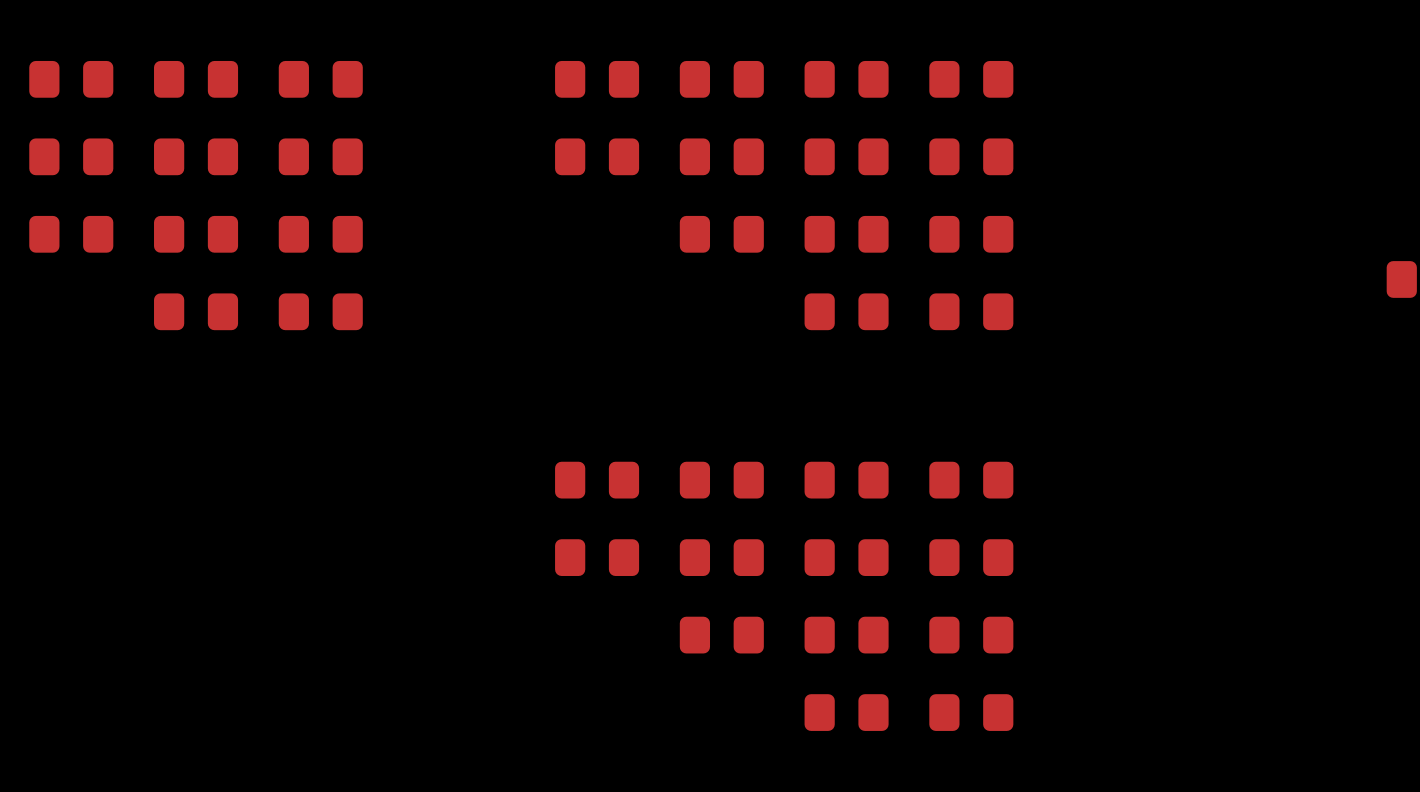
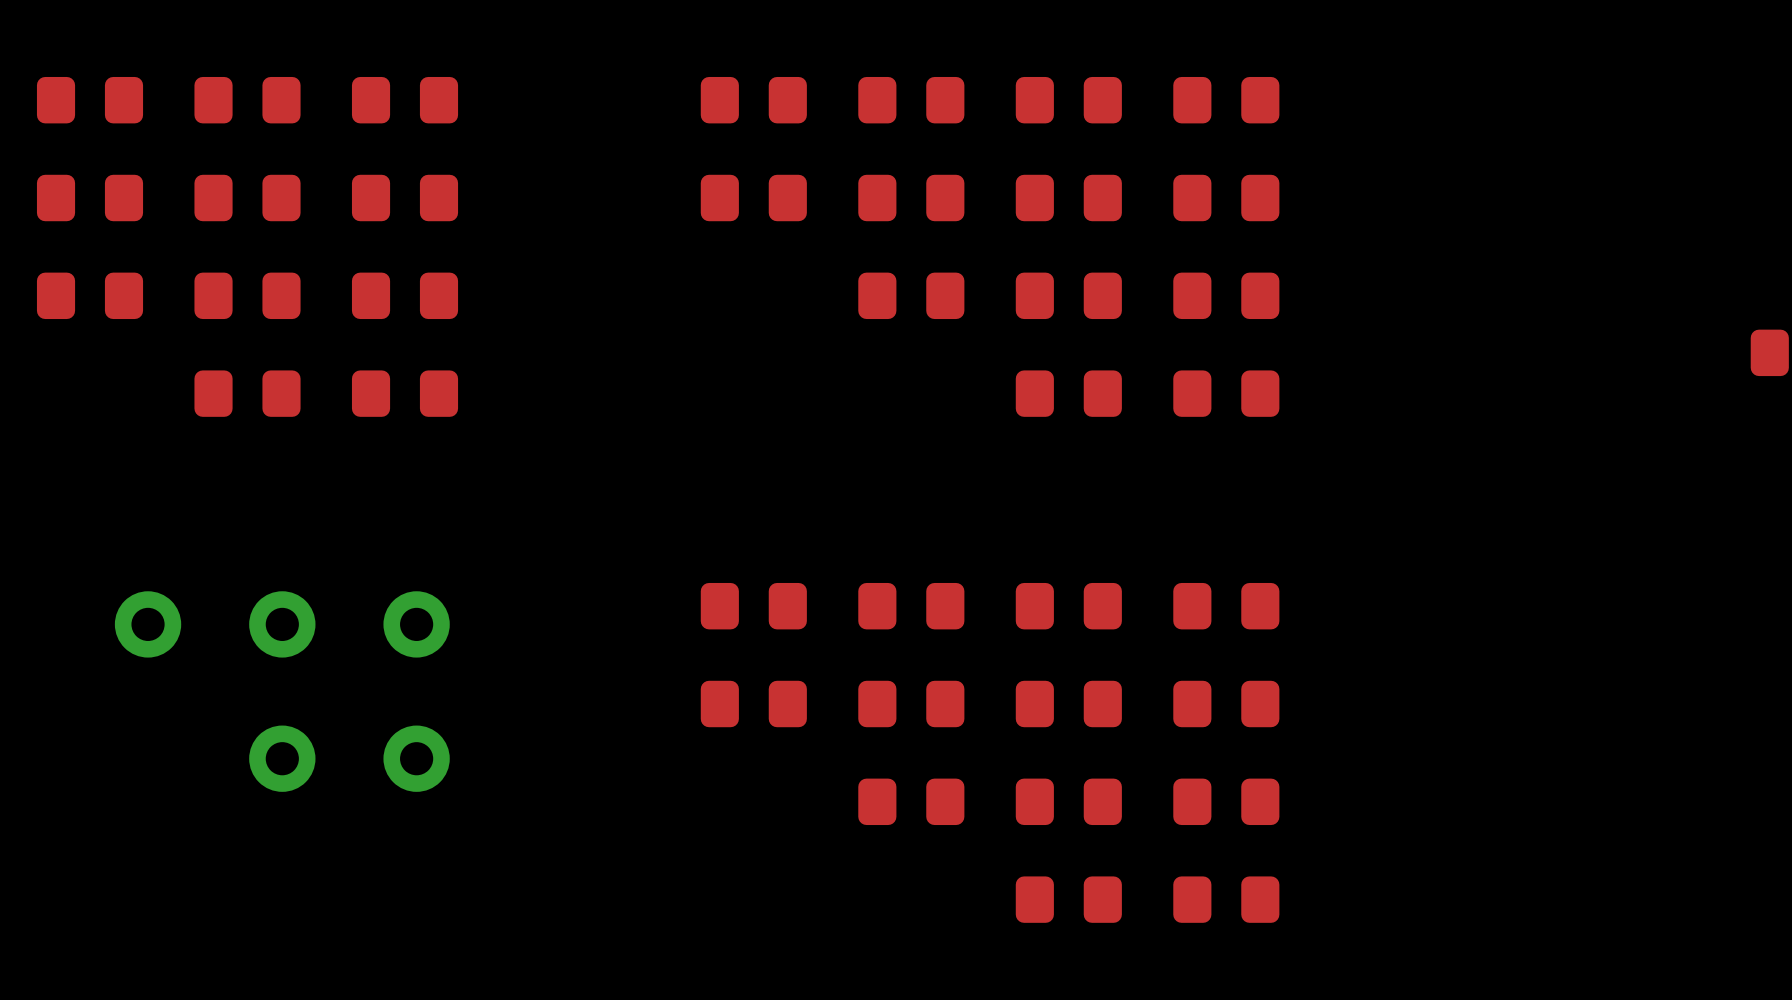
part: none -> (148, 624)
part: none -> (282, 624)
part: none -> (416, 624)
part: none -> (282, 758)
part: none -> (416, 758)

